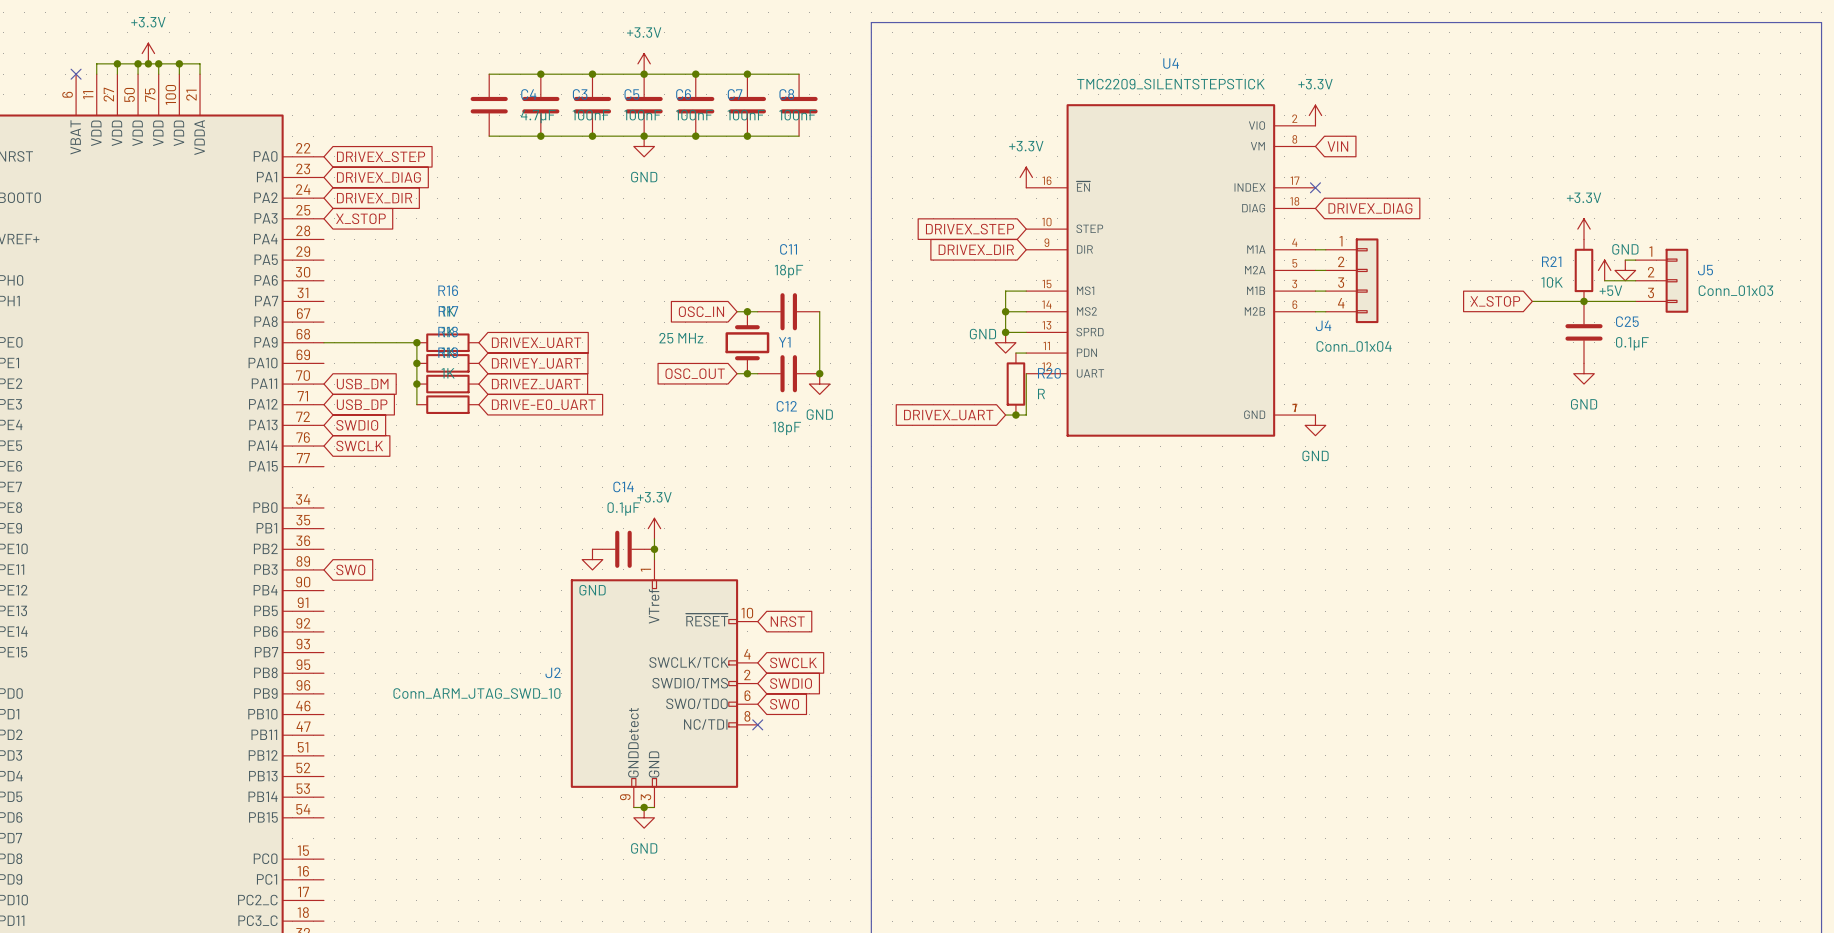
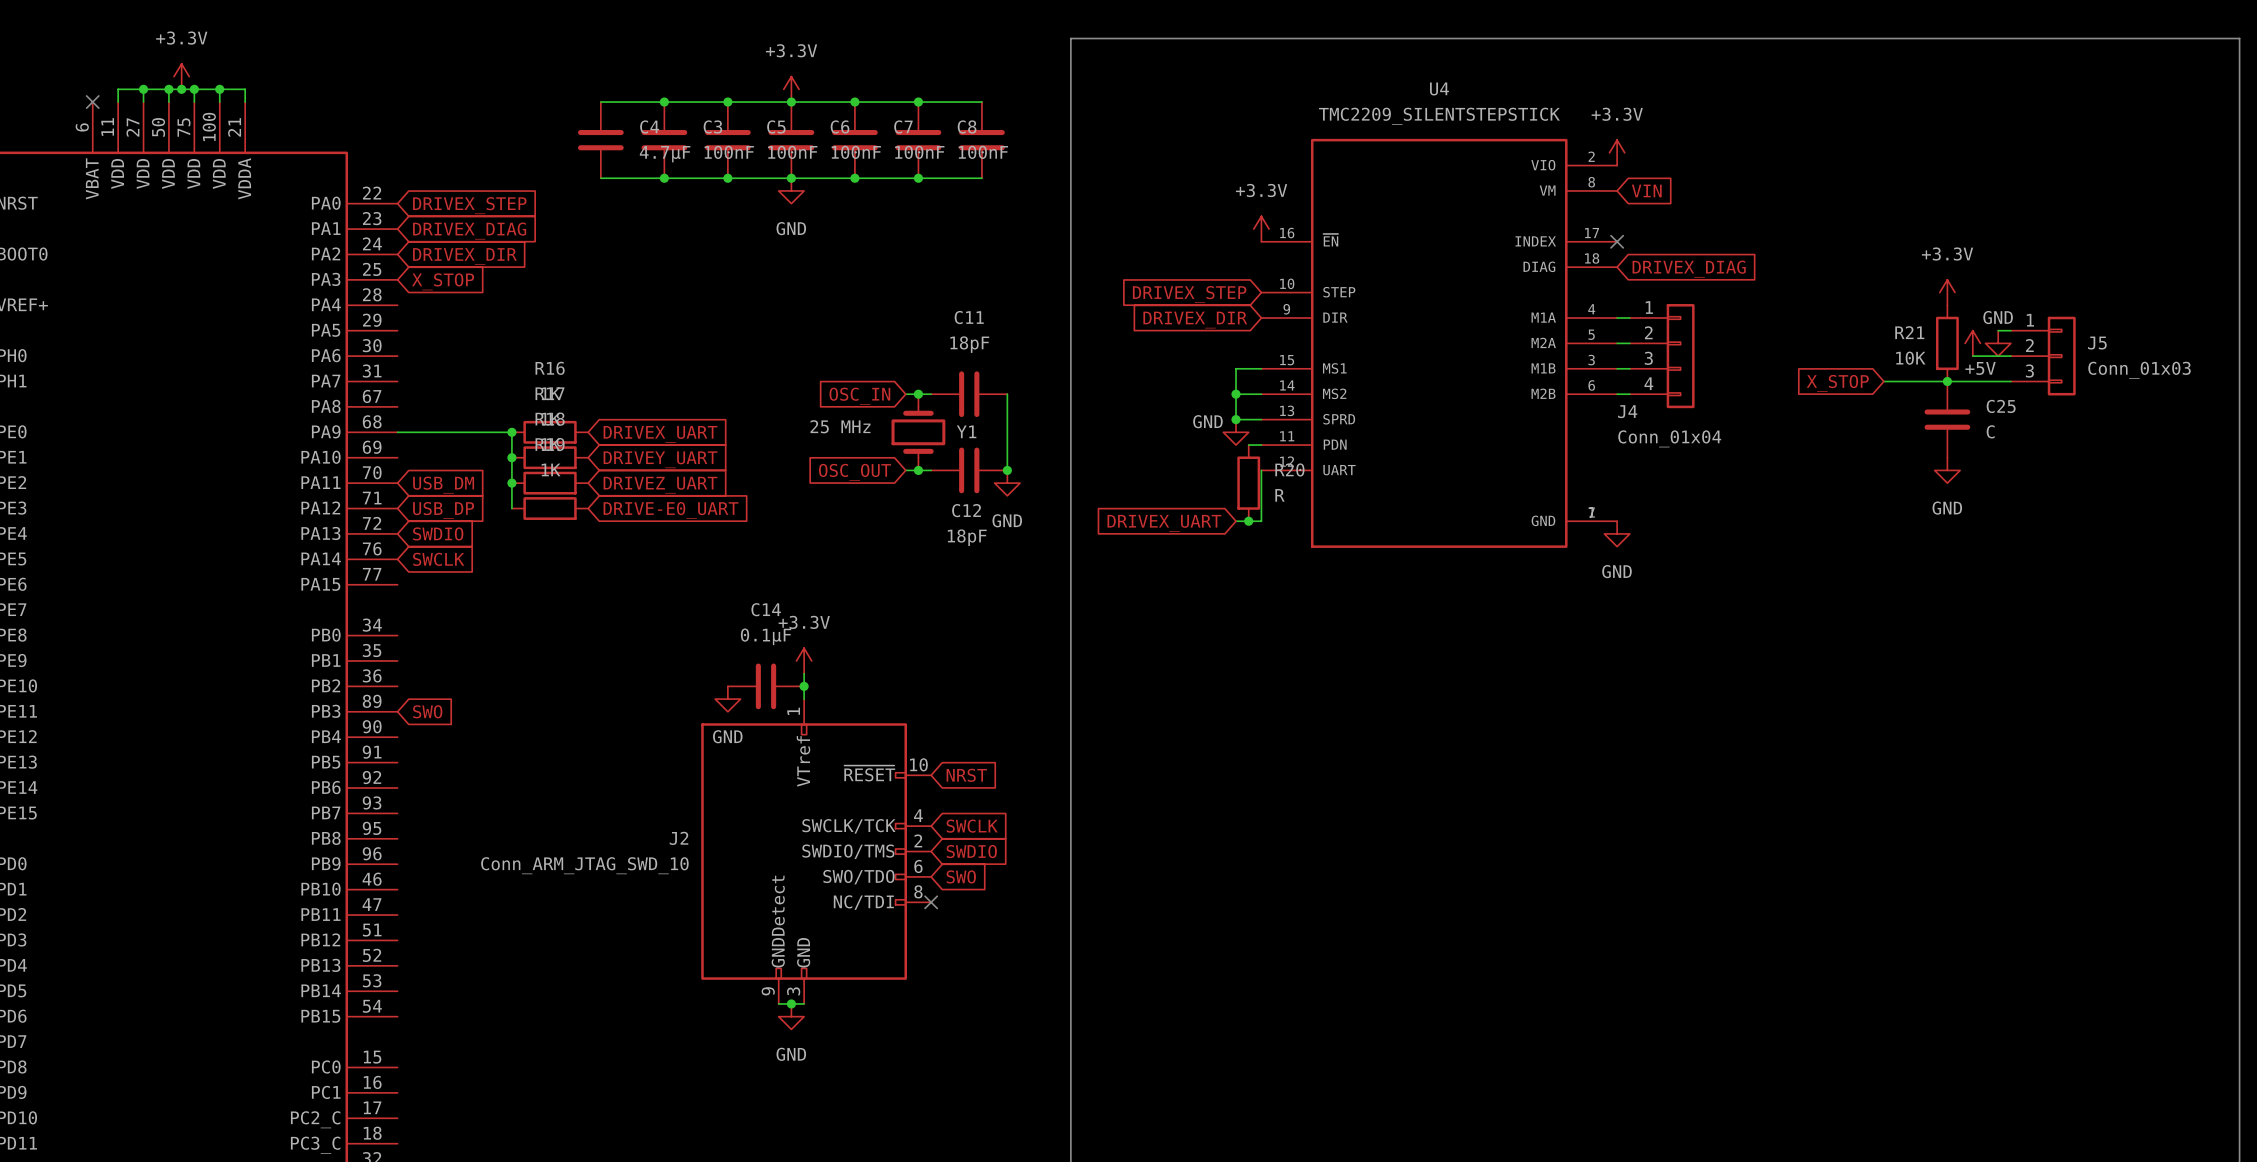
C25 value: 0.1µF (1632, 343) -> C (1990, 431)

